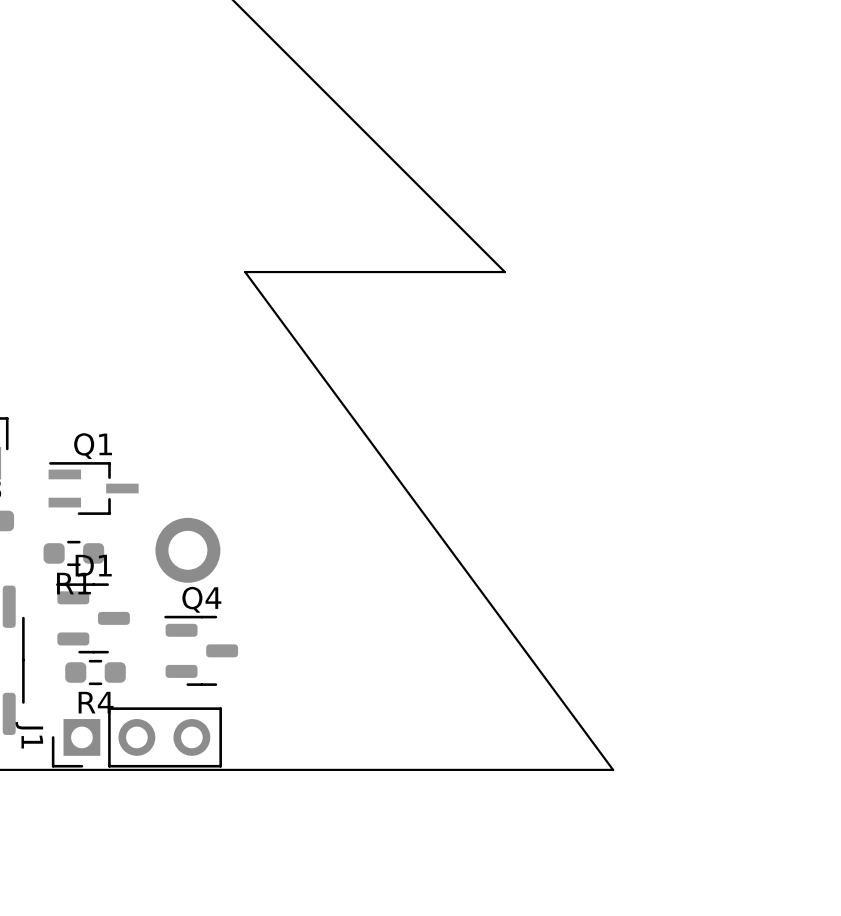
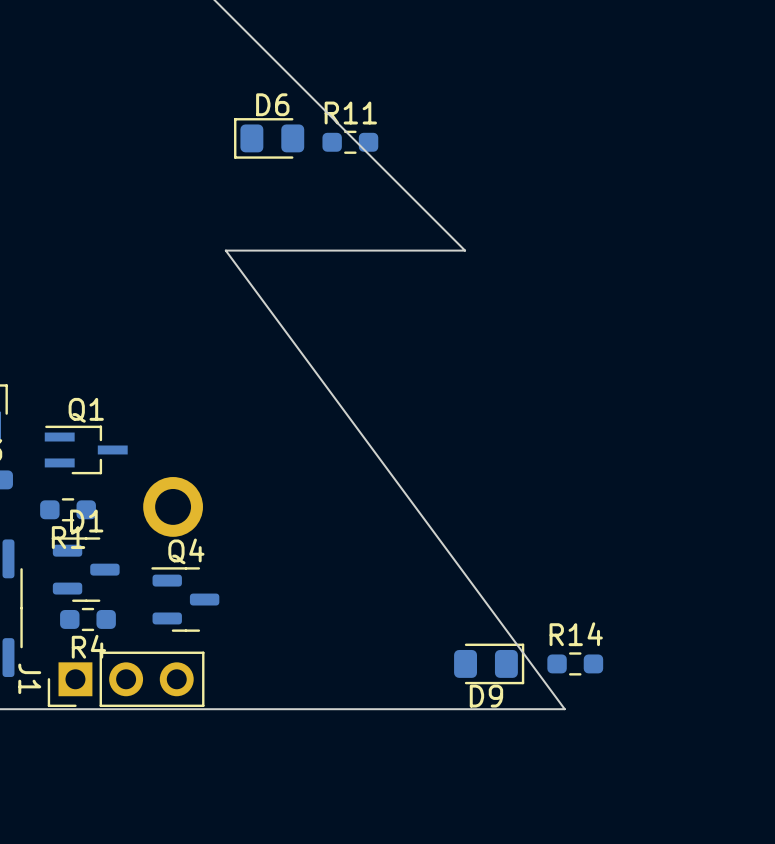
D6: none -> (269, 138)
R11: none -> (350, 142)
D9: none -> (489, 663)
R14: none -> (575, 663)

